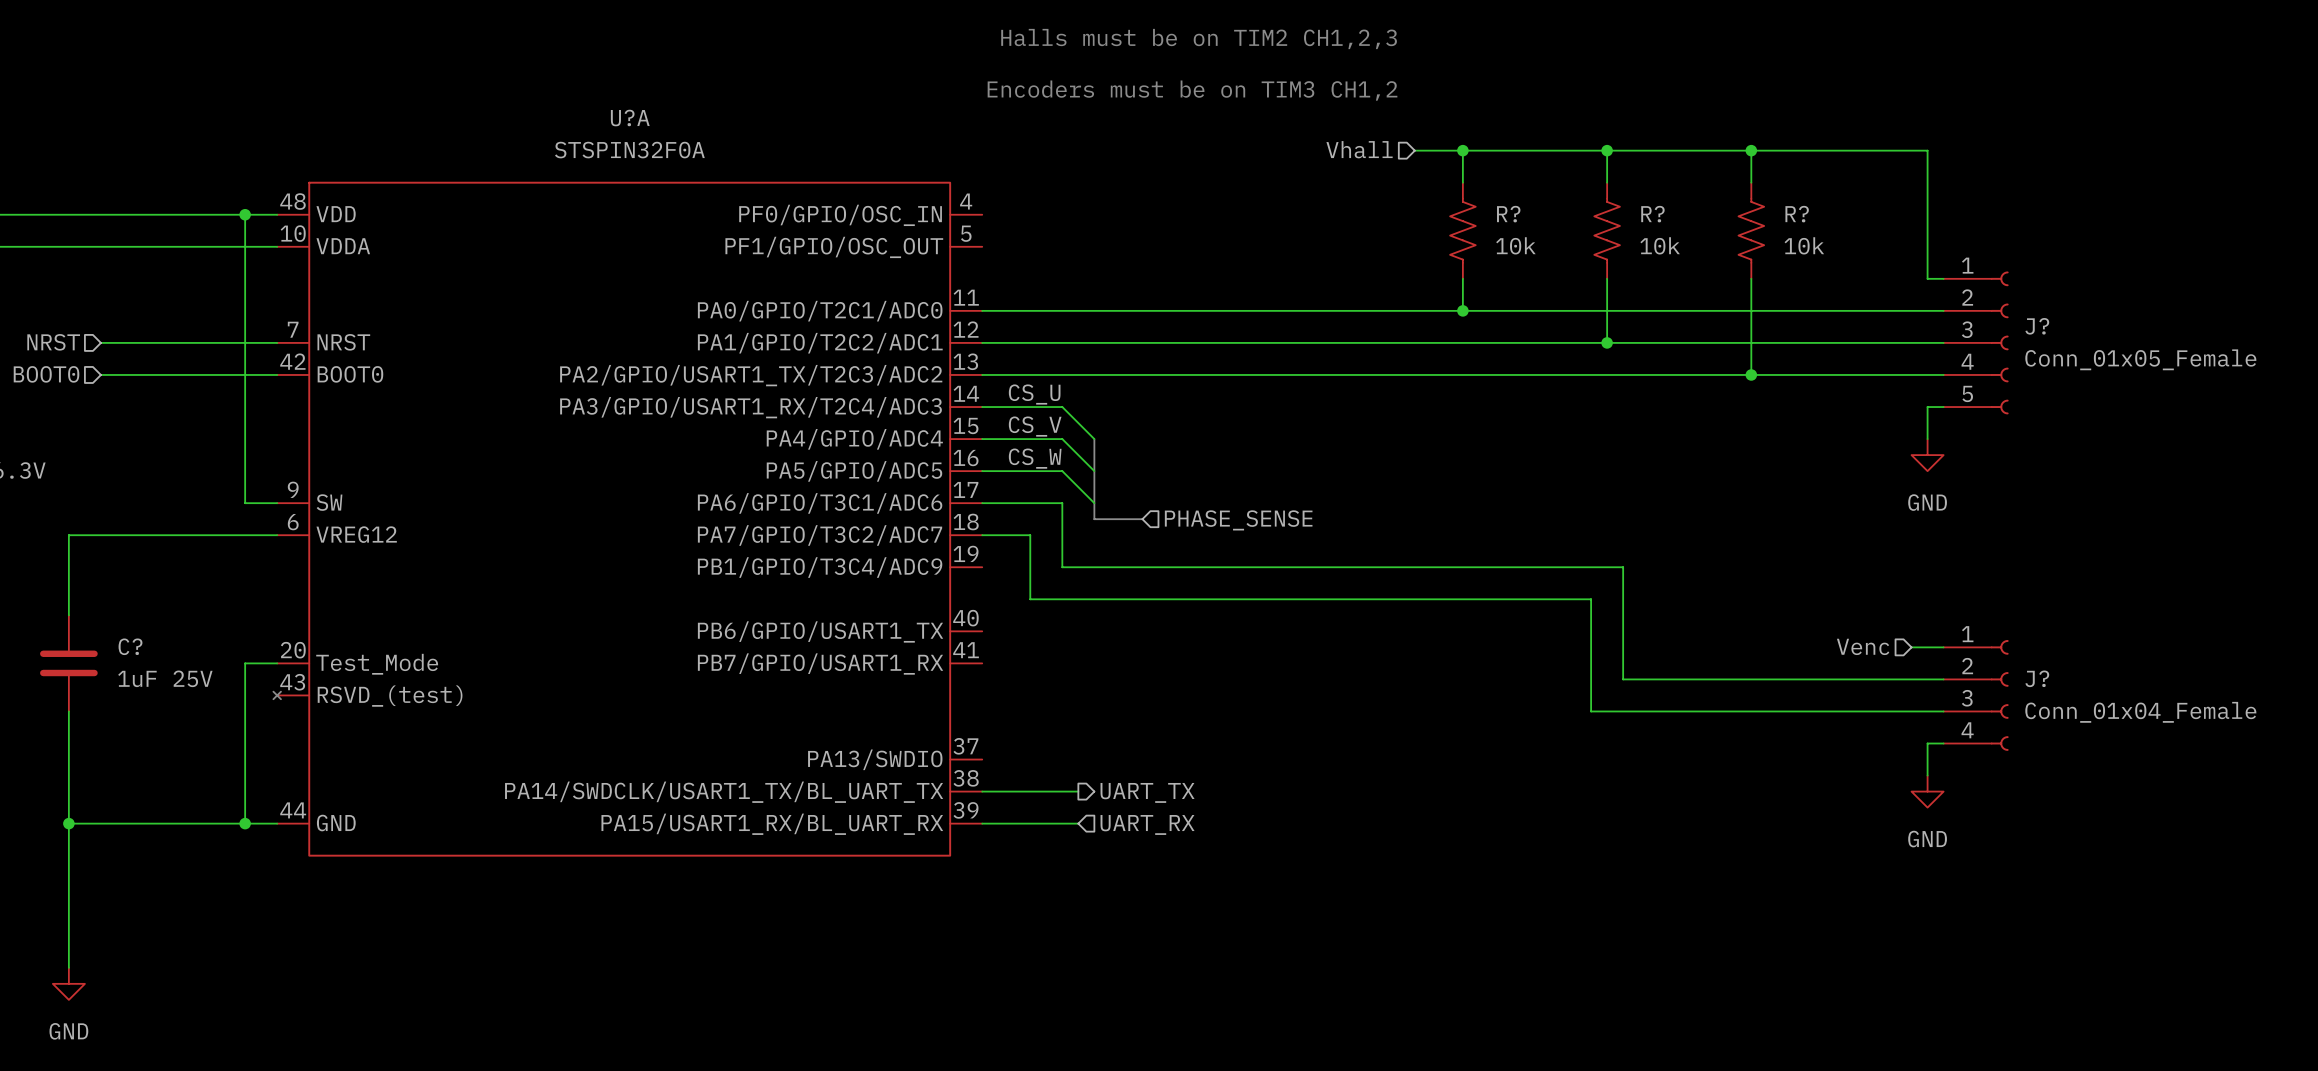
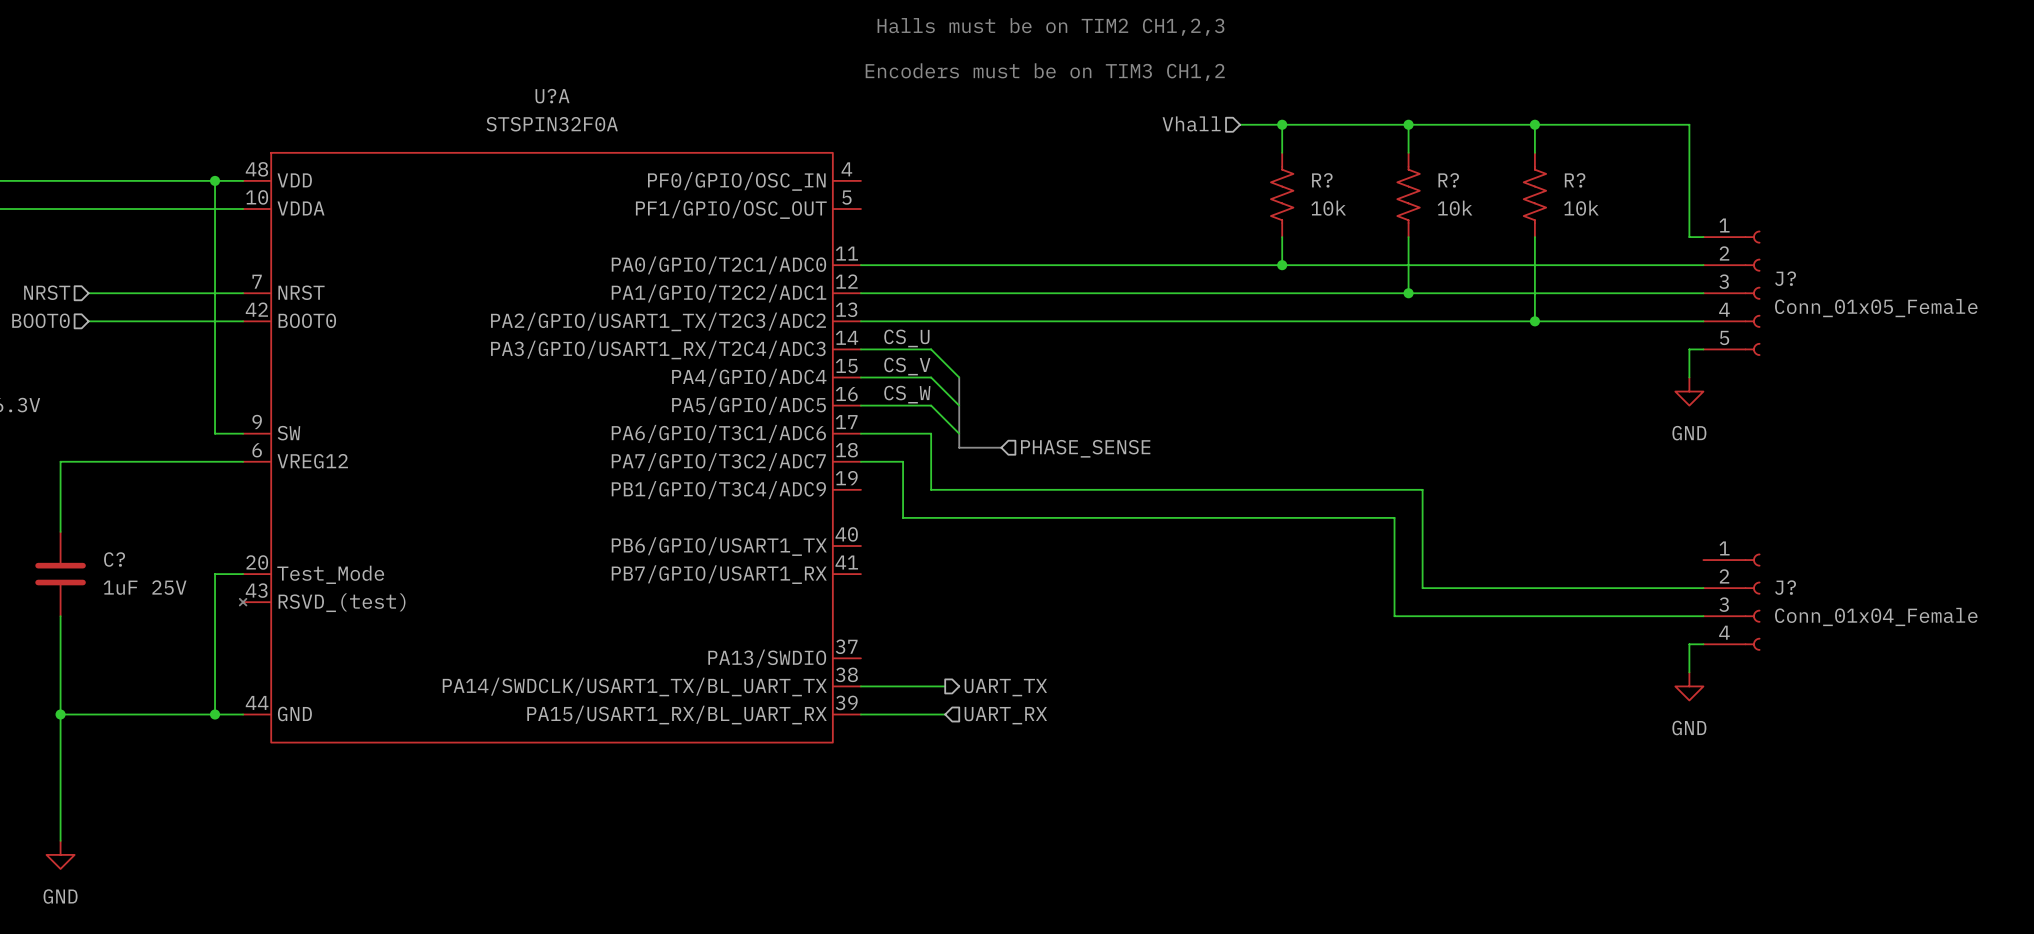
hierarchical label: Venc (1863, 646) -> none
wire: (1911, 647) (1943, 647) -> none

